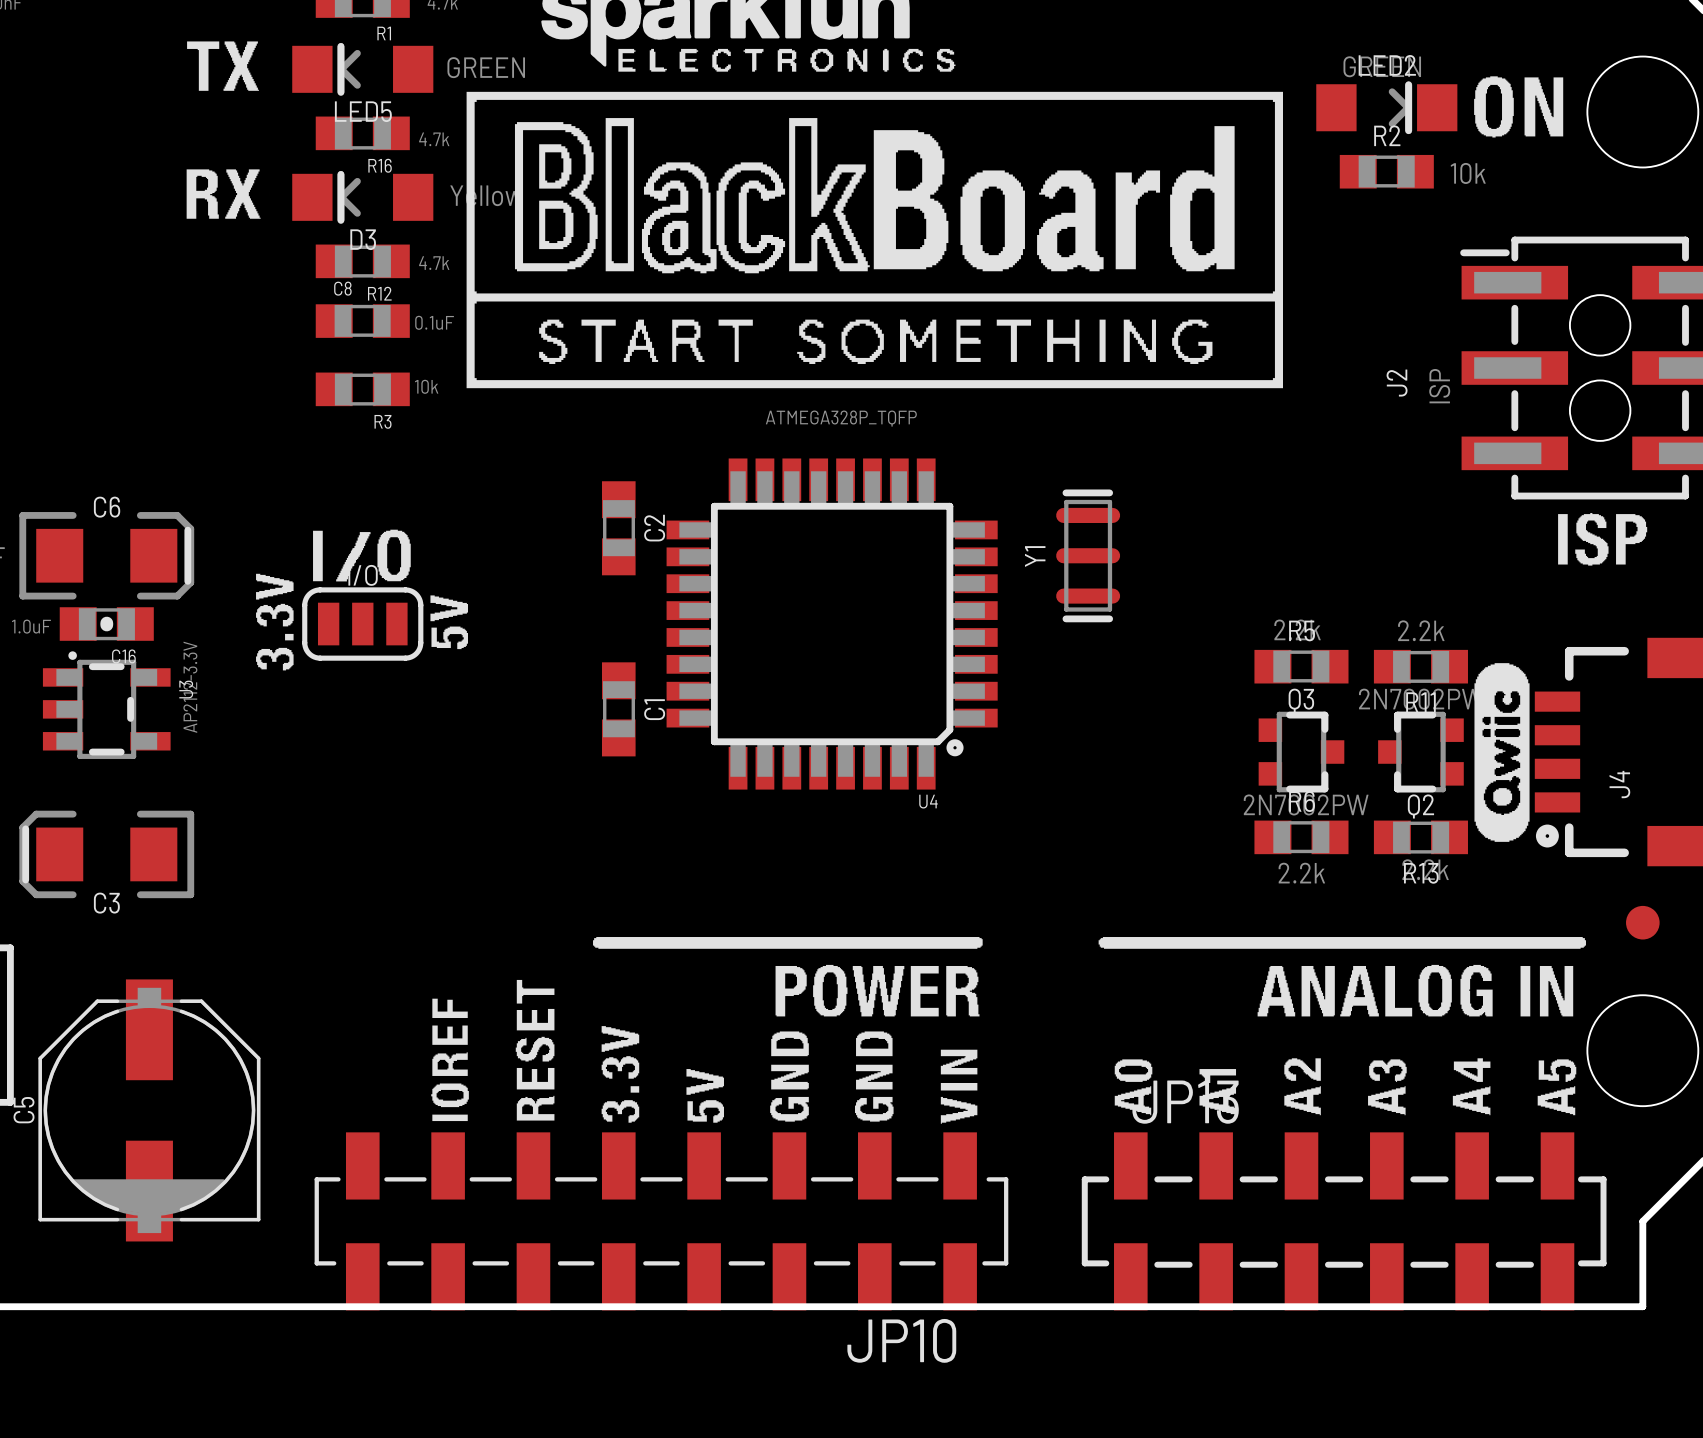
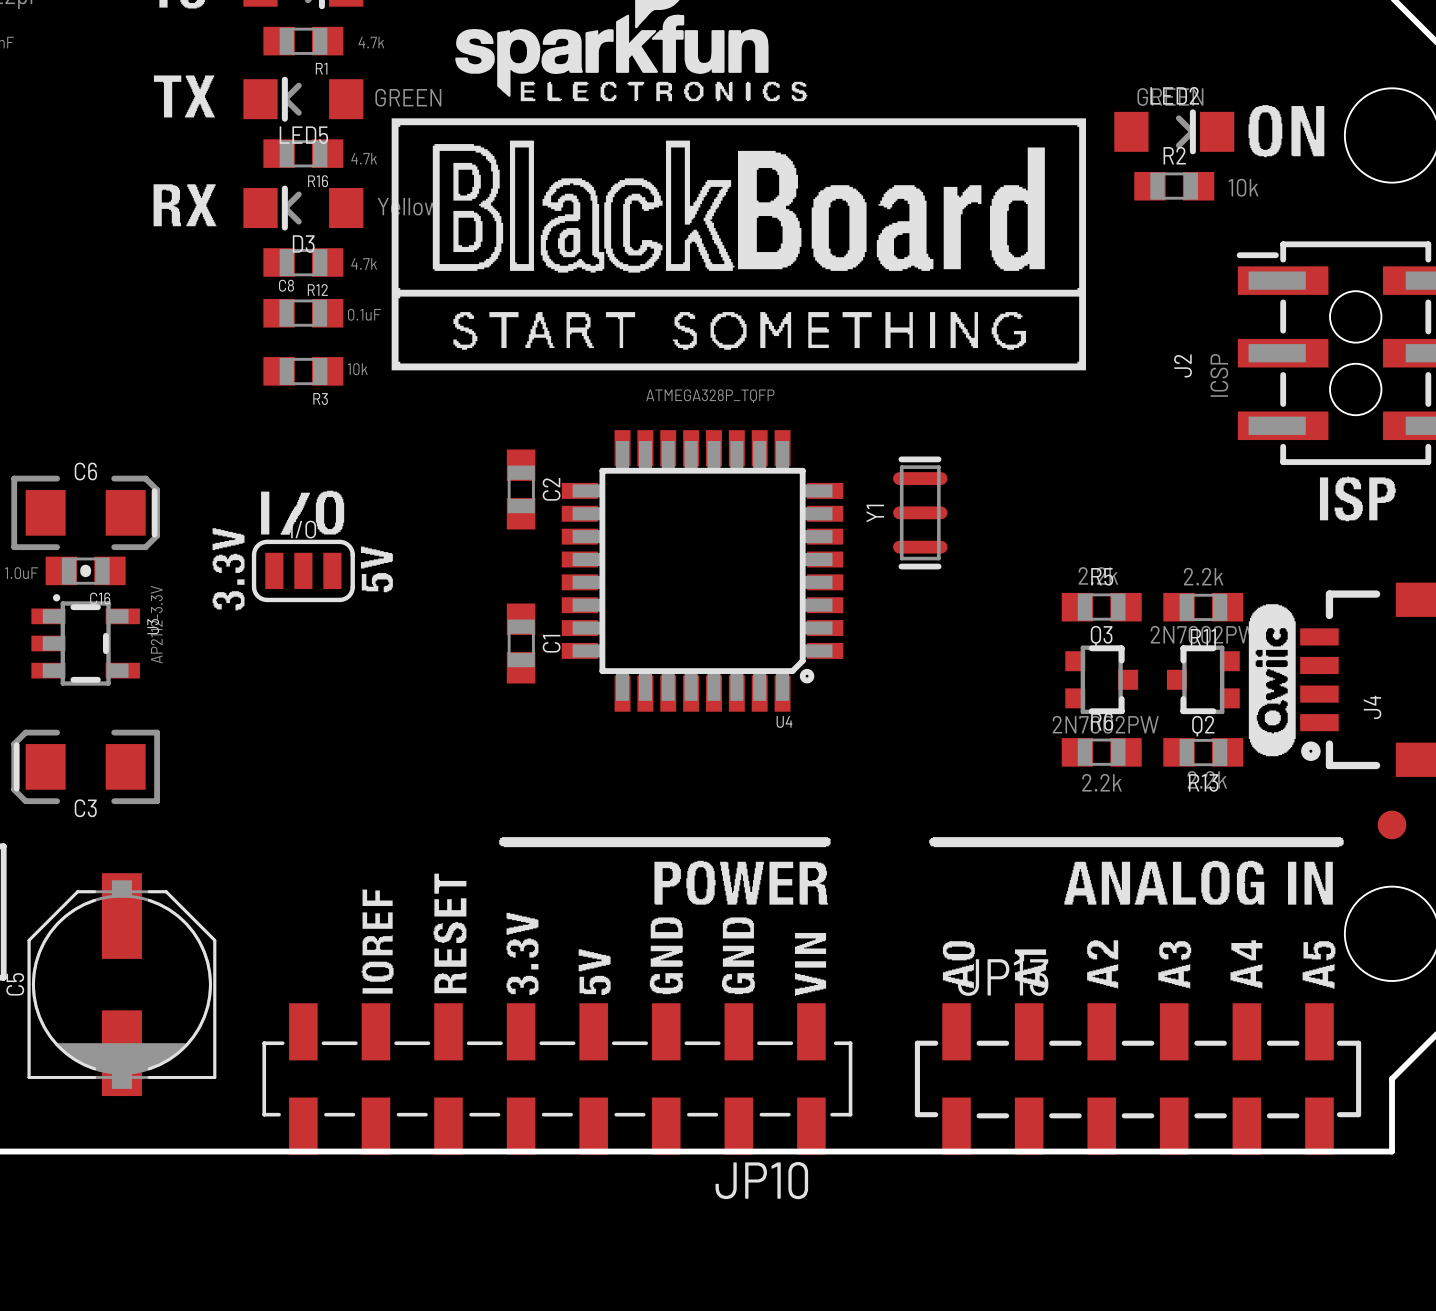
J2 value: ISP (1439, 386) -> ICSP (1219, 375)

